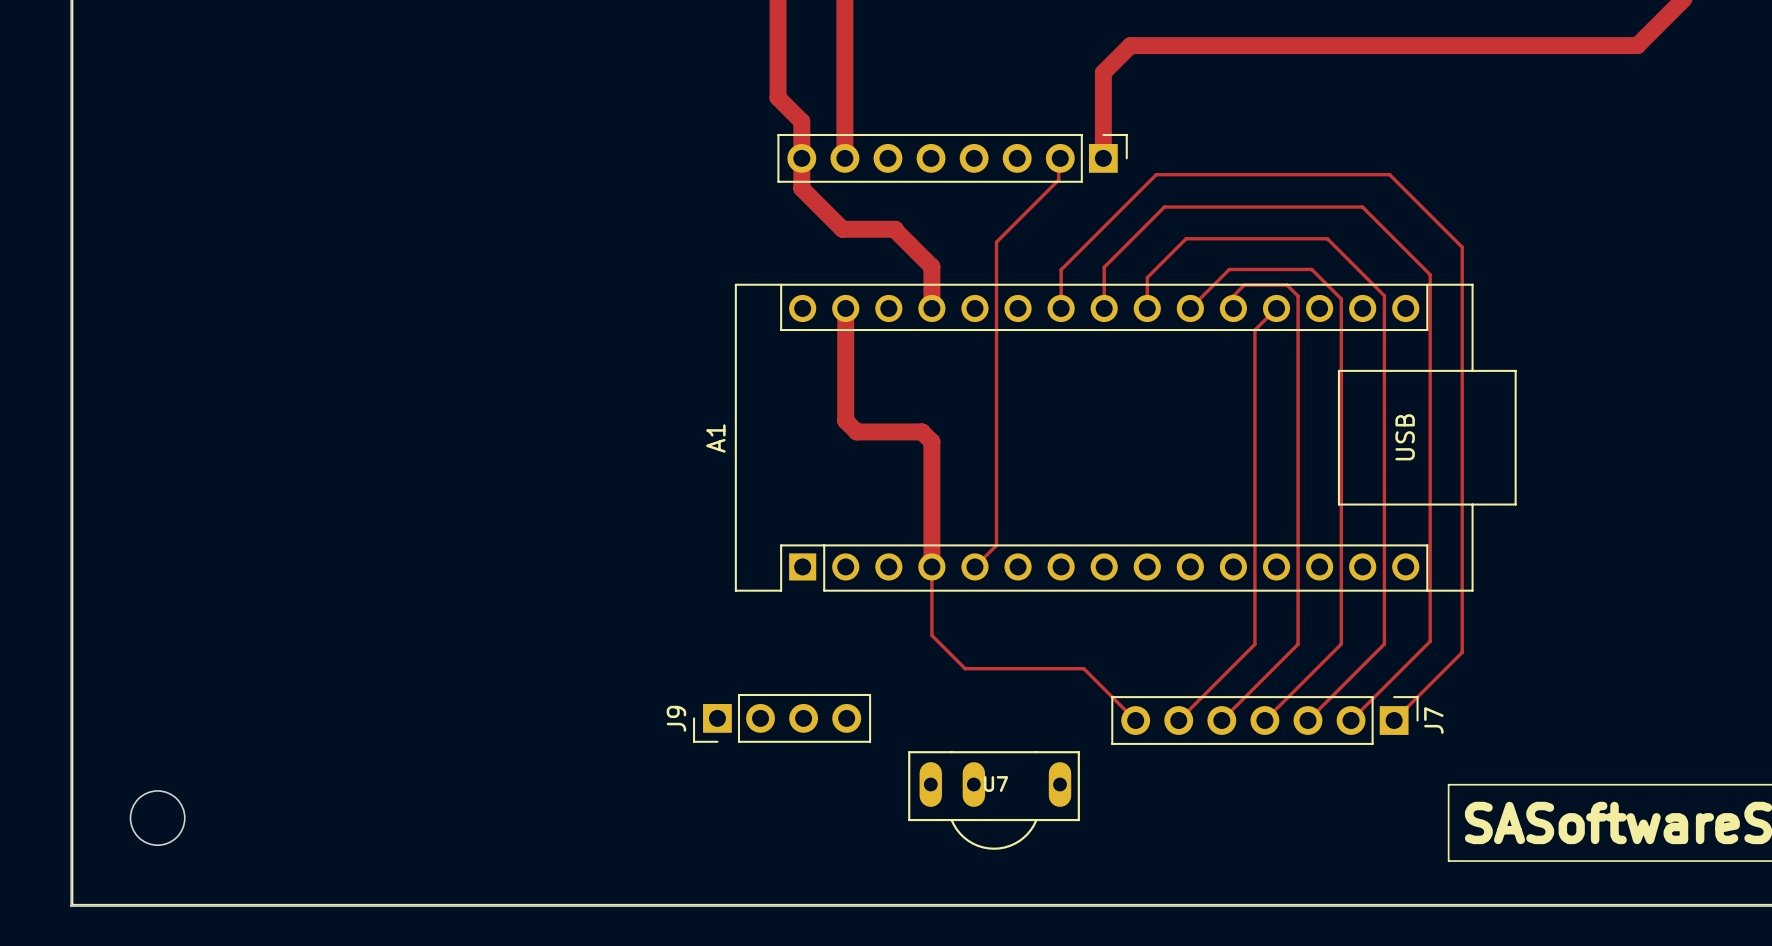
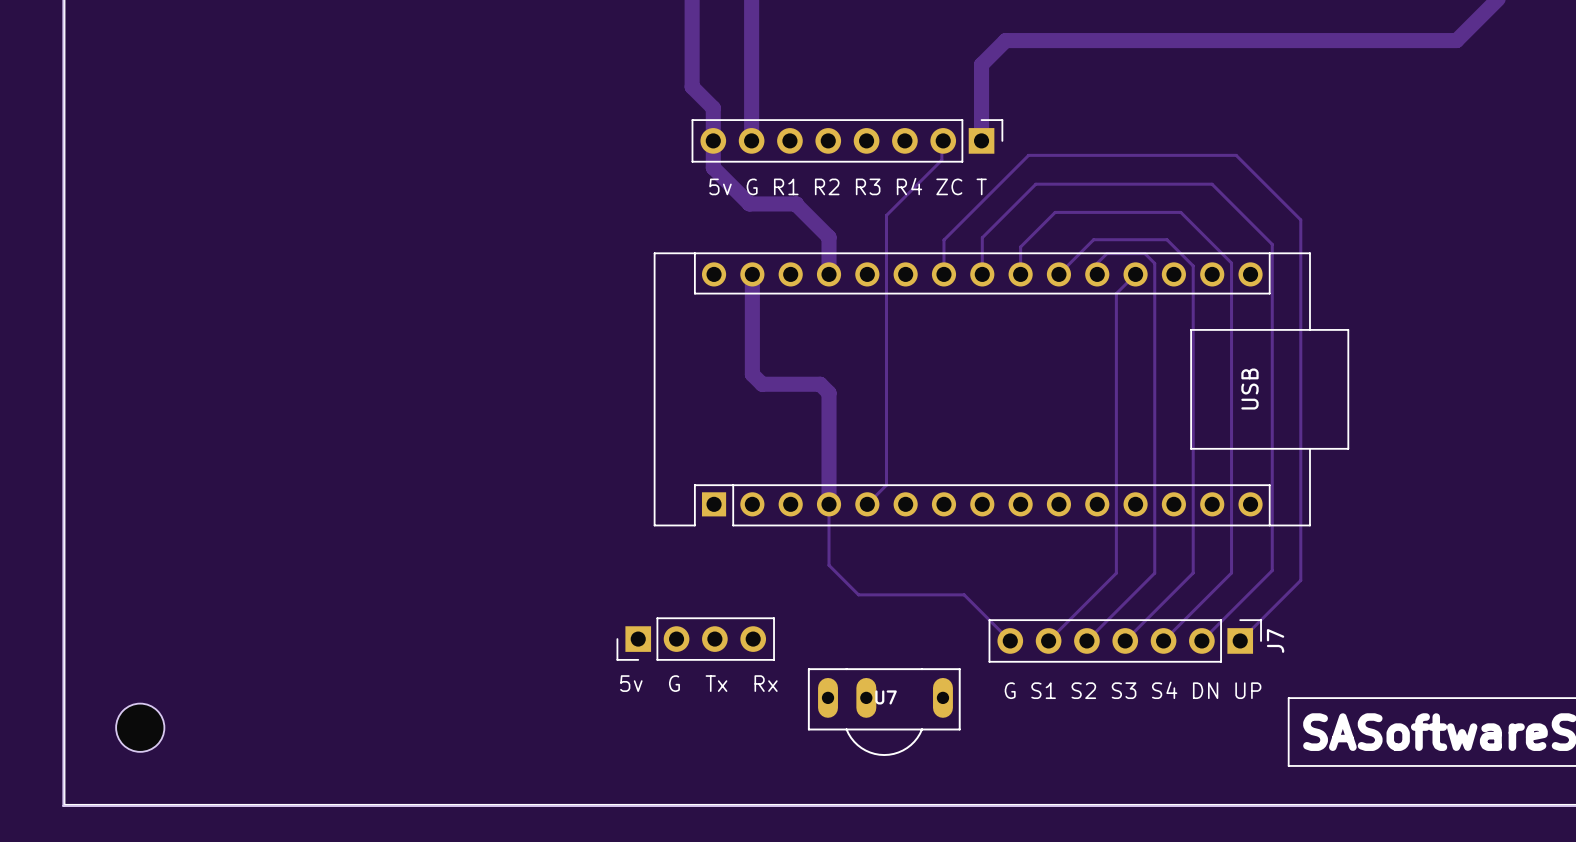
text: none -> 5v G R1 R2 R3 R4 ZC T (848, 186)
A1 name: A1 (715, 438) -> none
J9 name: J9 (676, 718) -> none
text: none -> 5v G Tx Rx (698, 683)
text: none -> G S1 S2 S3 S4 DN UP (1133, 690)

